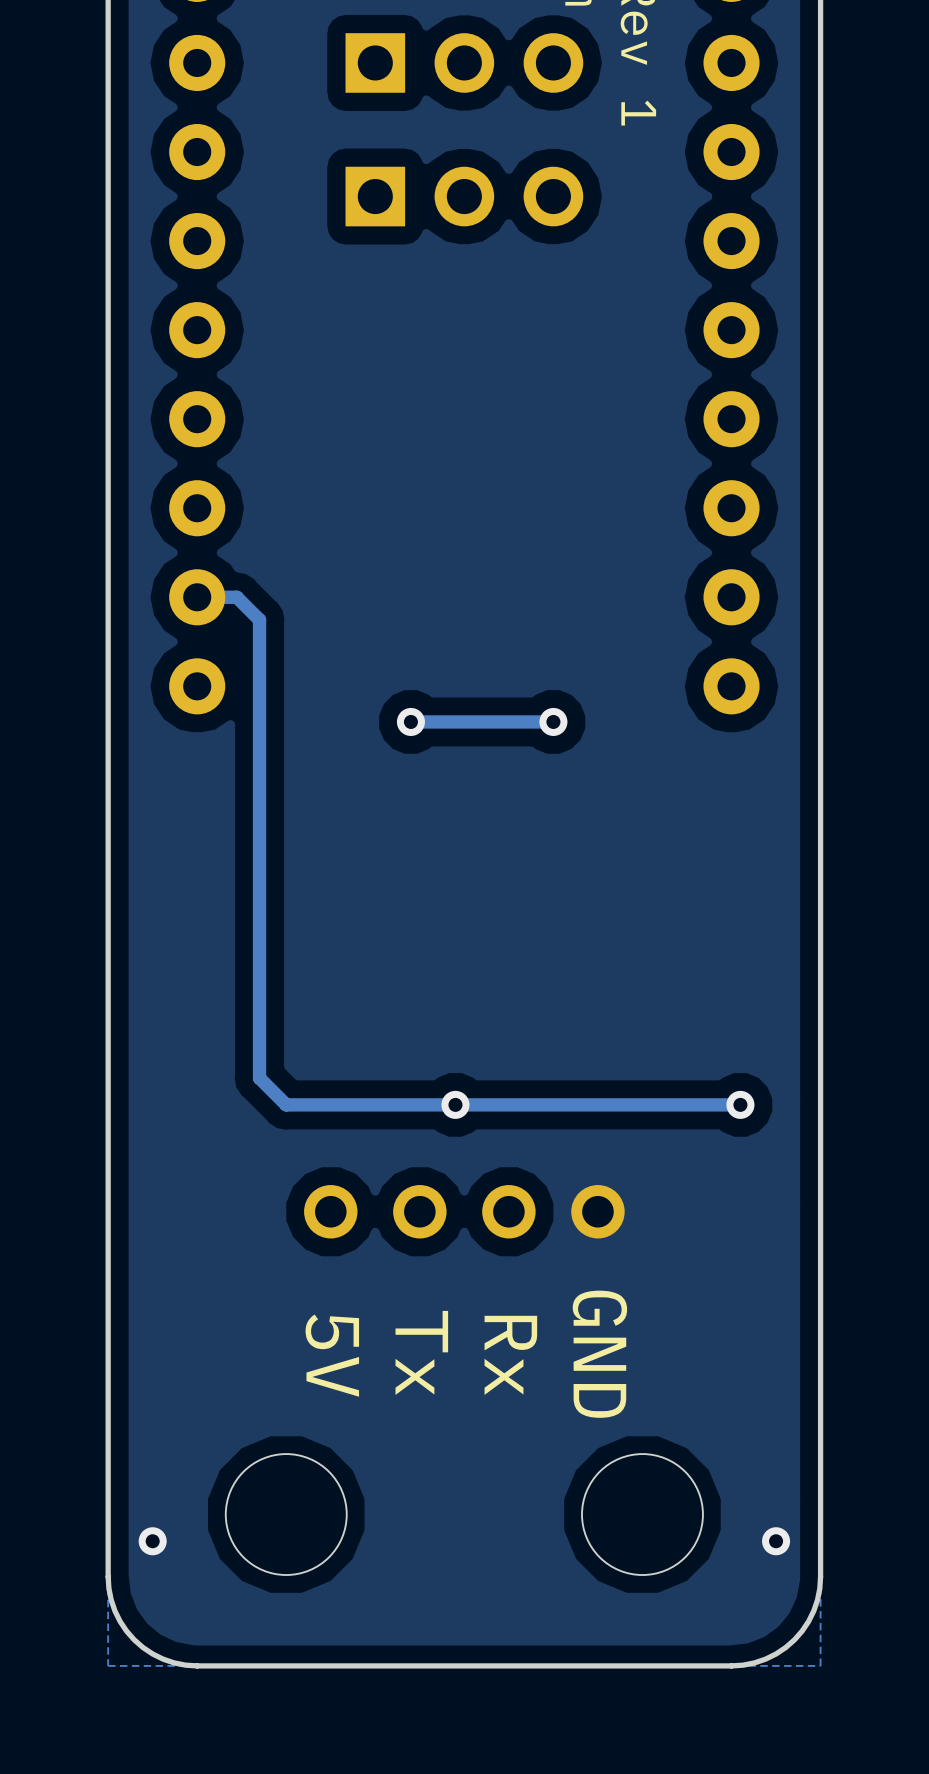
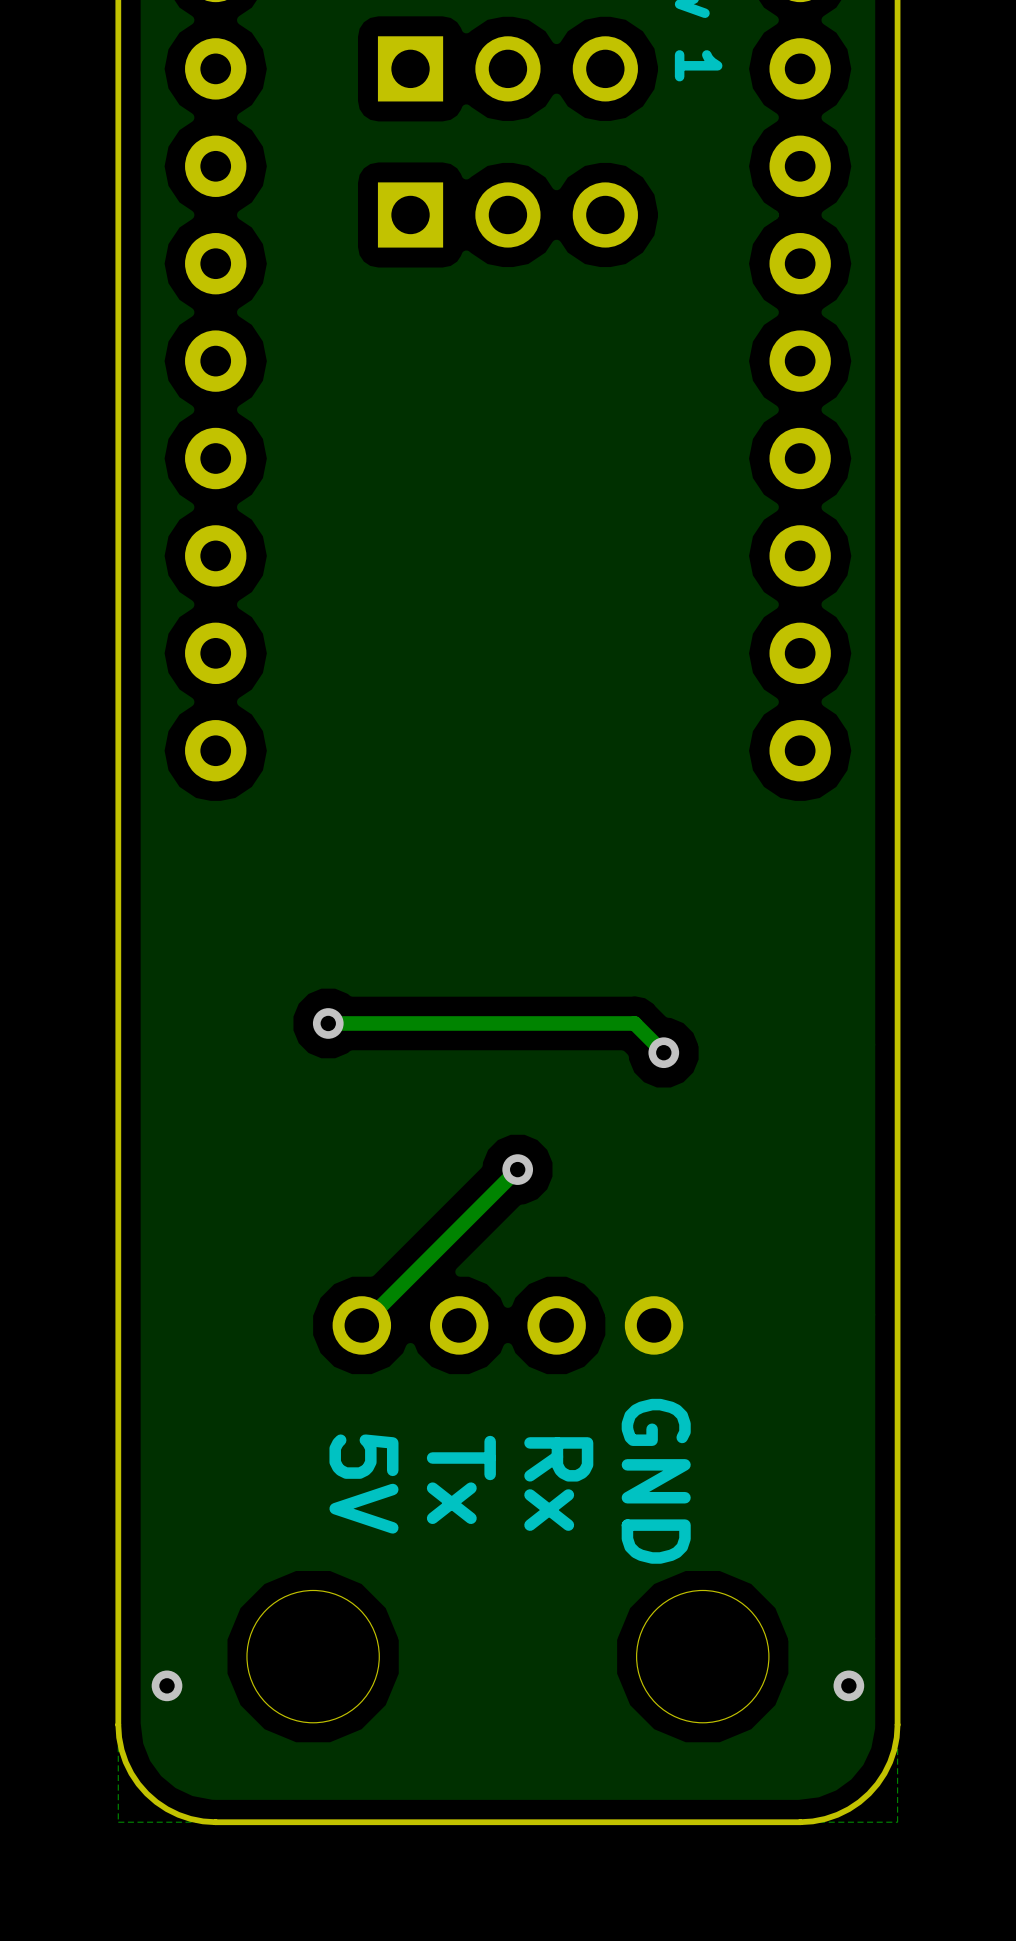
track: (197, 597) (236, 597) (259, 619) (259, 1078) (286, 1104) (740, 1104) -> none
via: (410, 721) -> none
track: (553, 721) (410, 721) -> none
via: (553, 721) -> none
track: none -> (328, 1023) (634, 1023) (663, 1052)
via: none -> (328, 1023)
via: none -> (663, 1052)
track: none -> (517, 1169) (361, 1325)
via position: (455, 1104) -> (517, 1169)
via: (740, 1104) -> none

